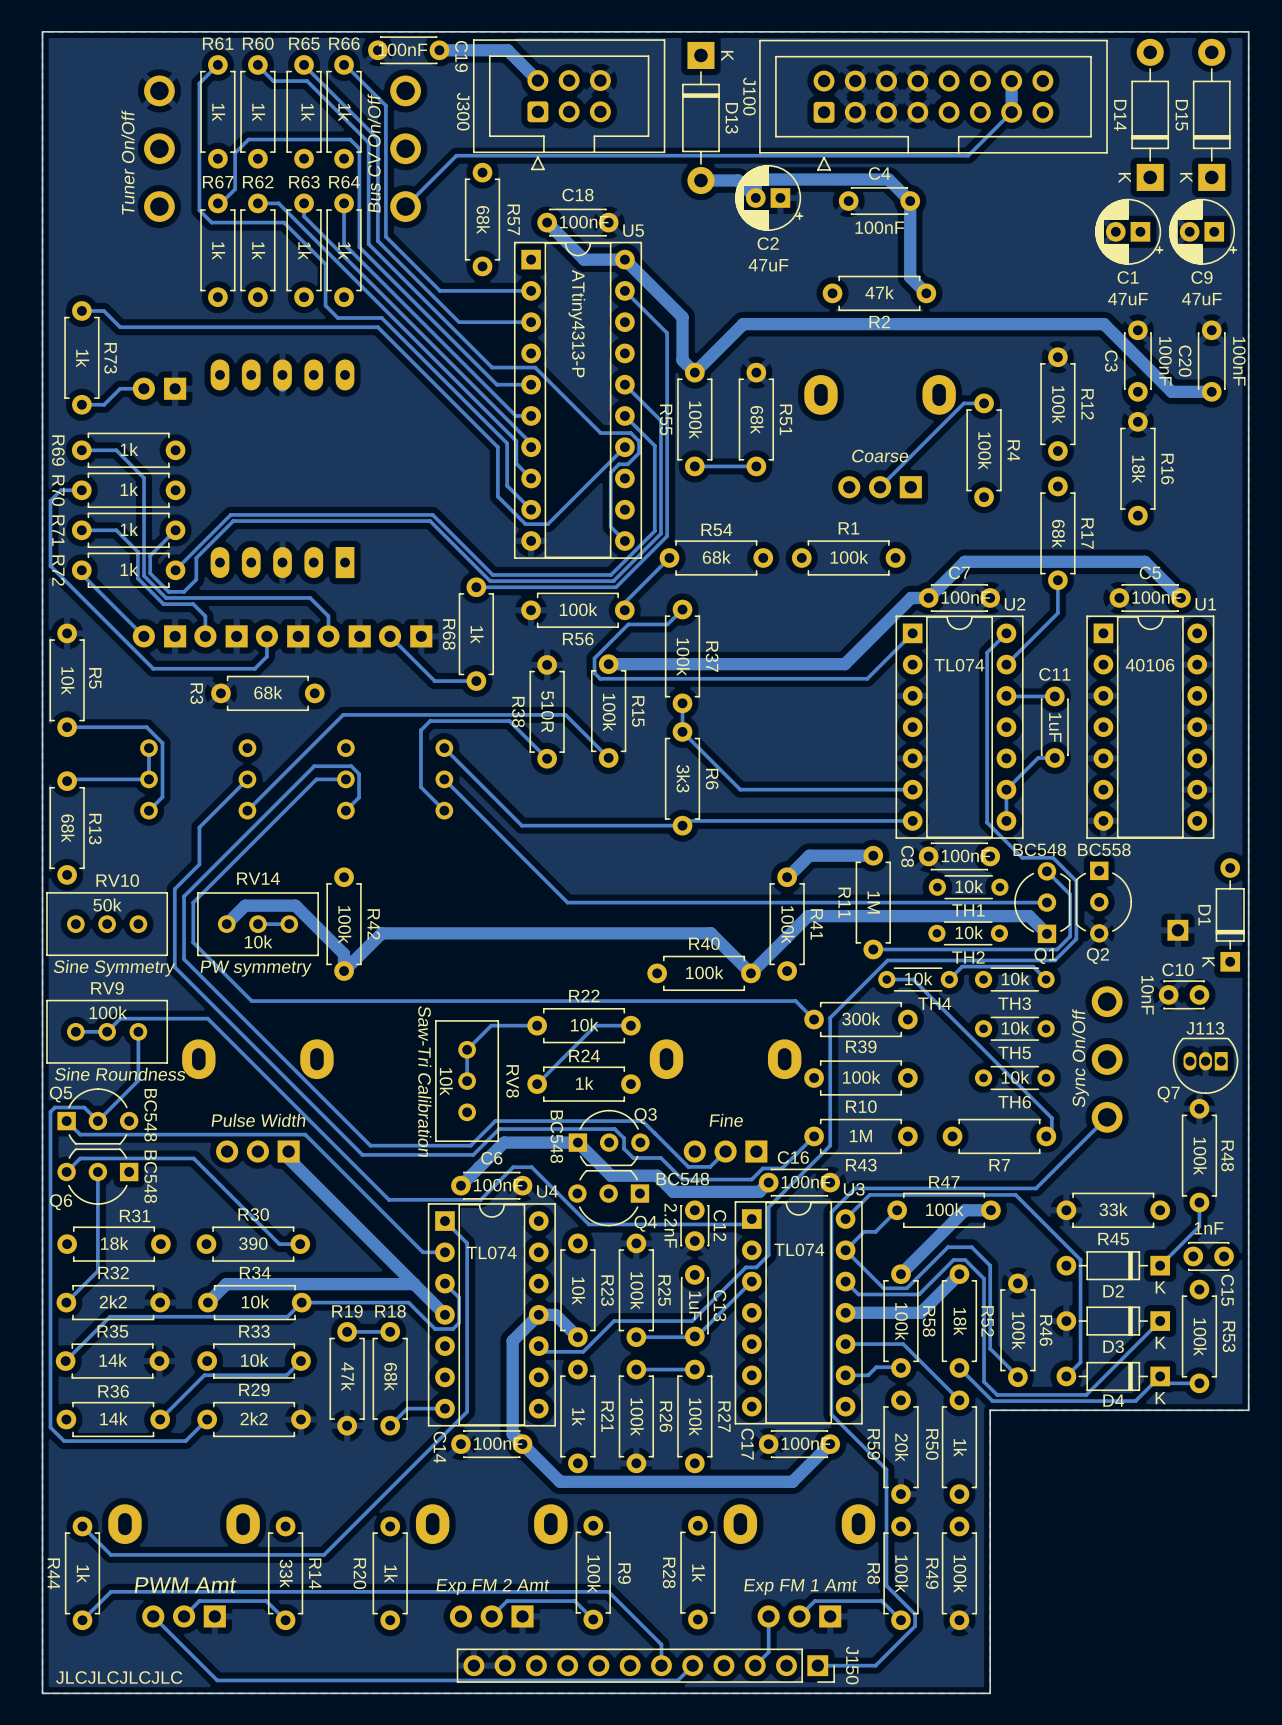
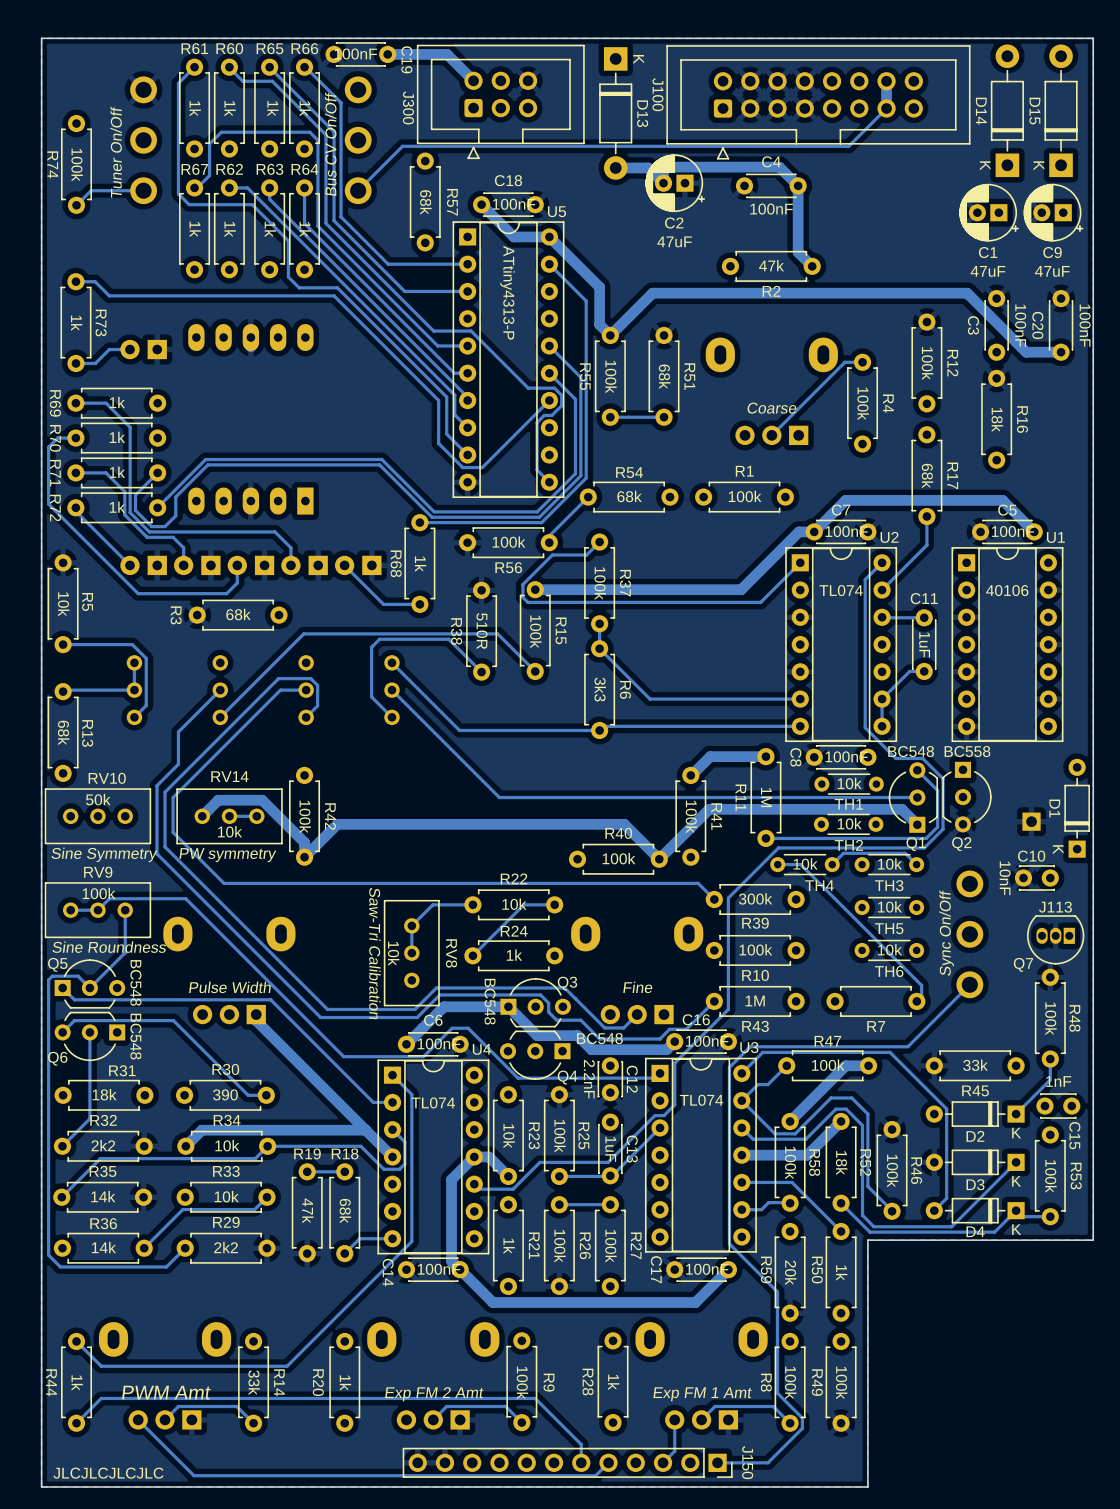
R74: none -> 100k (76, 164)
track: none -> (143, 190) (91, 190) (76, 205)

